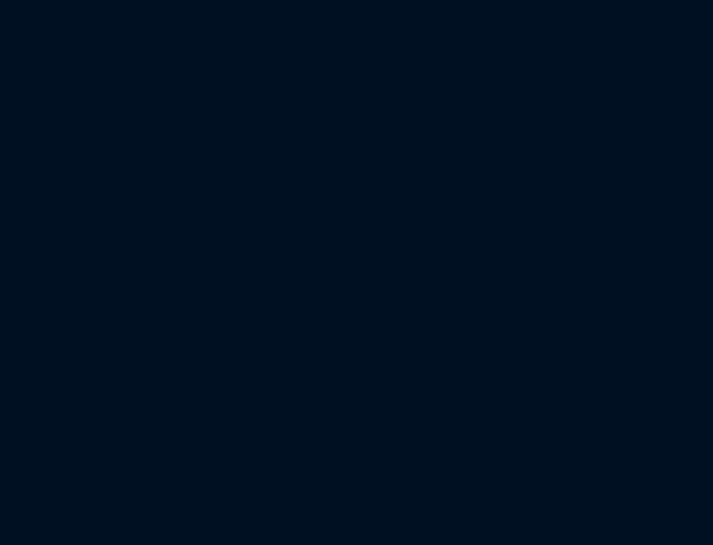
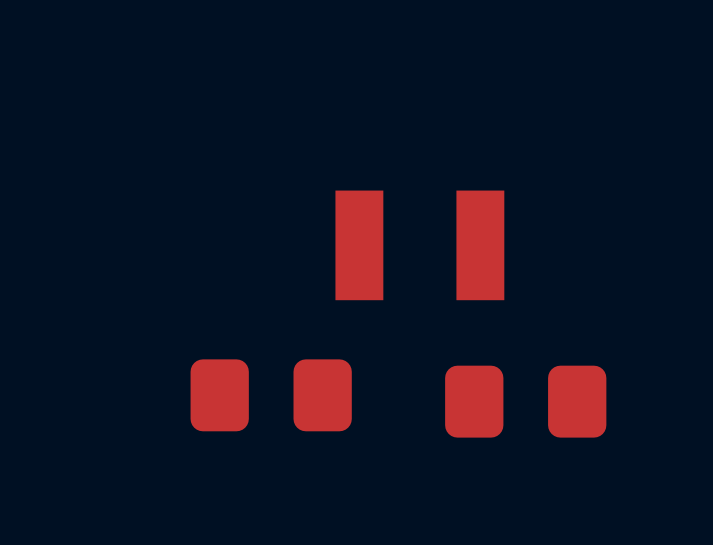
part: none -> (419, 245)
part: none -> (271, 395)
part: none -> (525, 401)

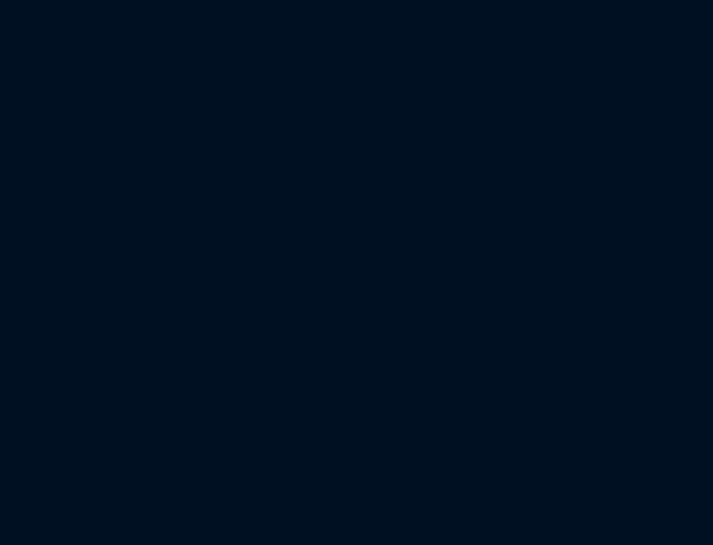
part: (419, 245) -> none
part: (271, 395) -> none
part: (525, 401) -> none

